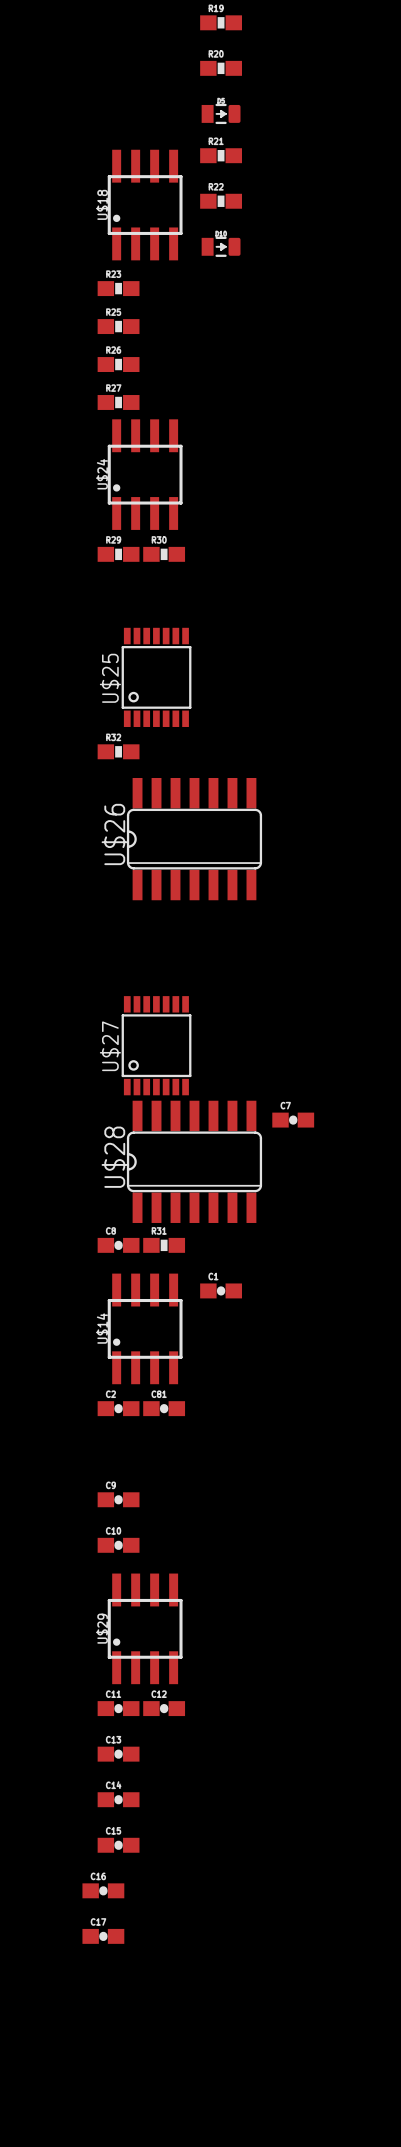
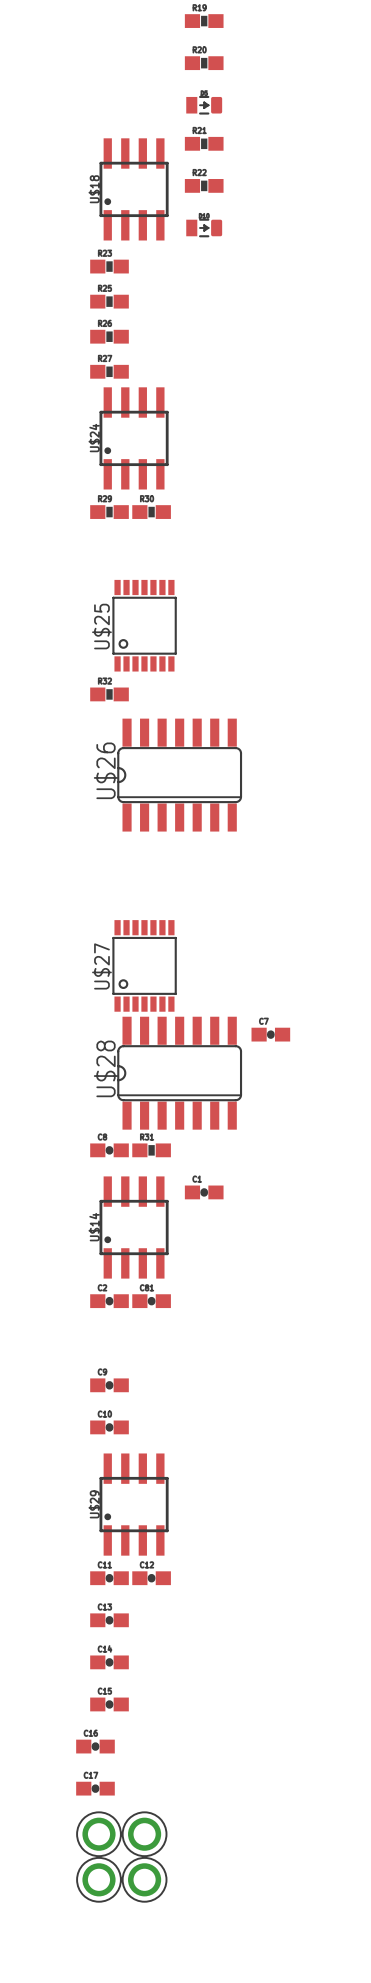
part: none -> (98, 1834)
part: none -> (144, 1834)
part: none -> (98, 1879)
part: none -> (144, 1879)

